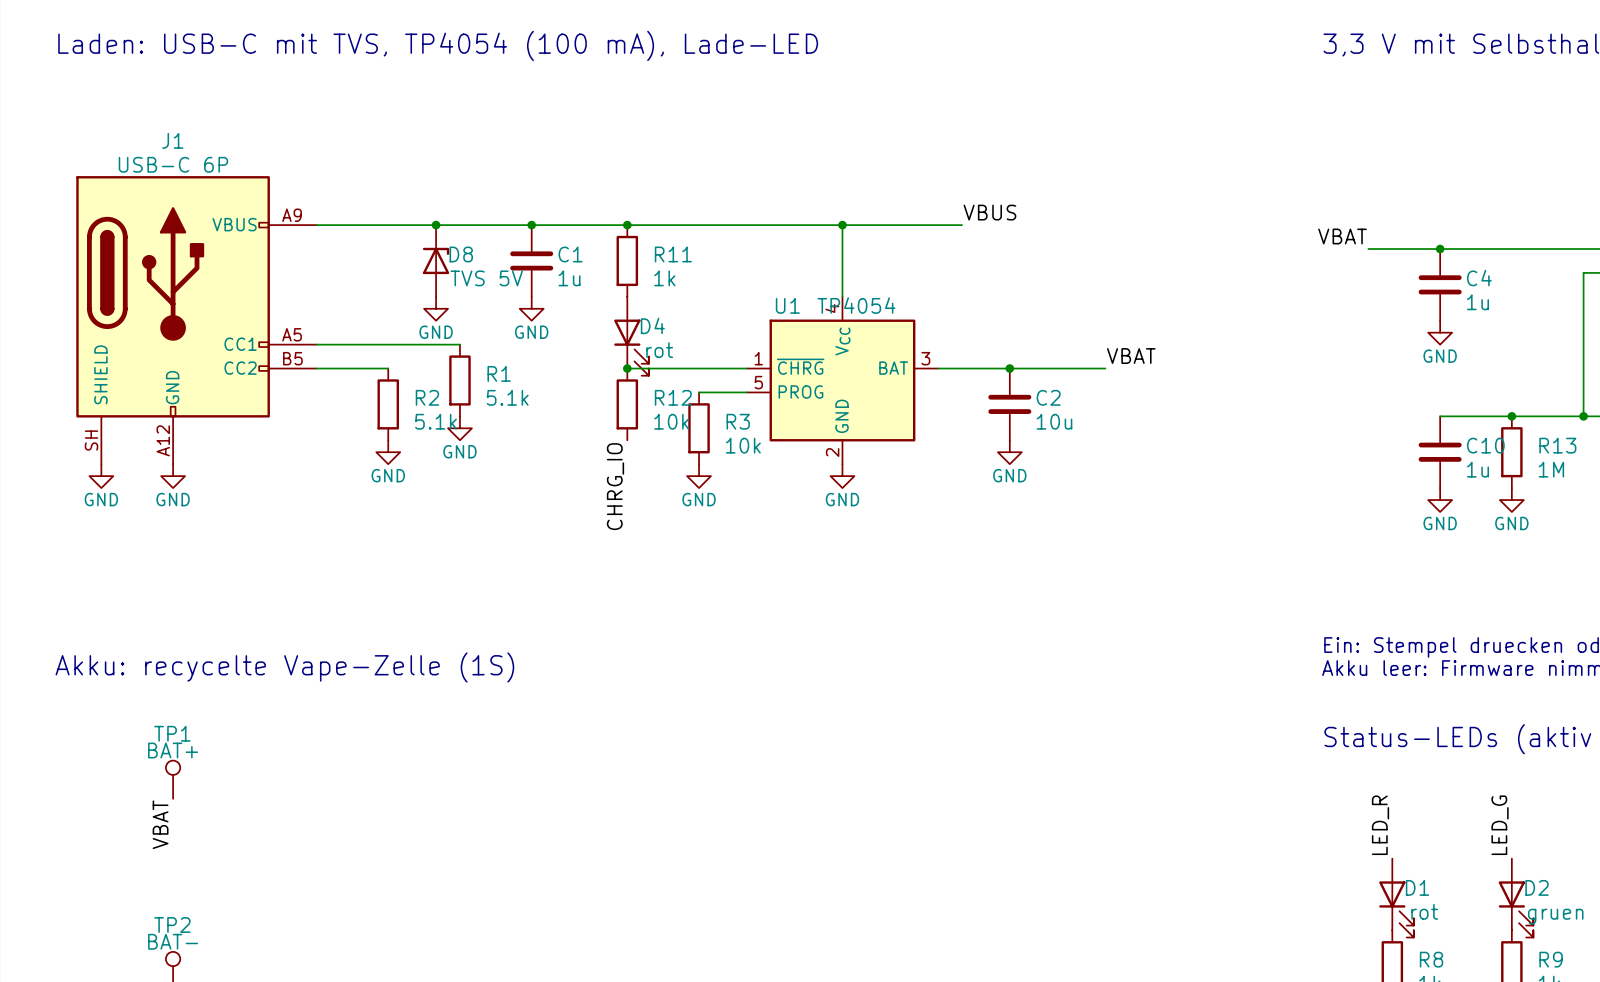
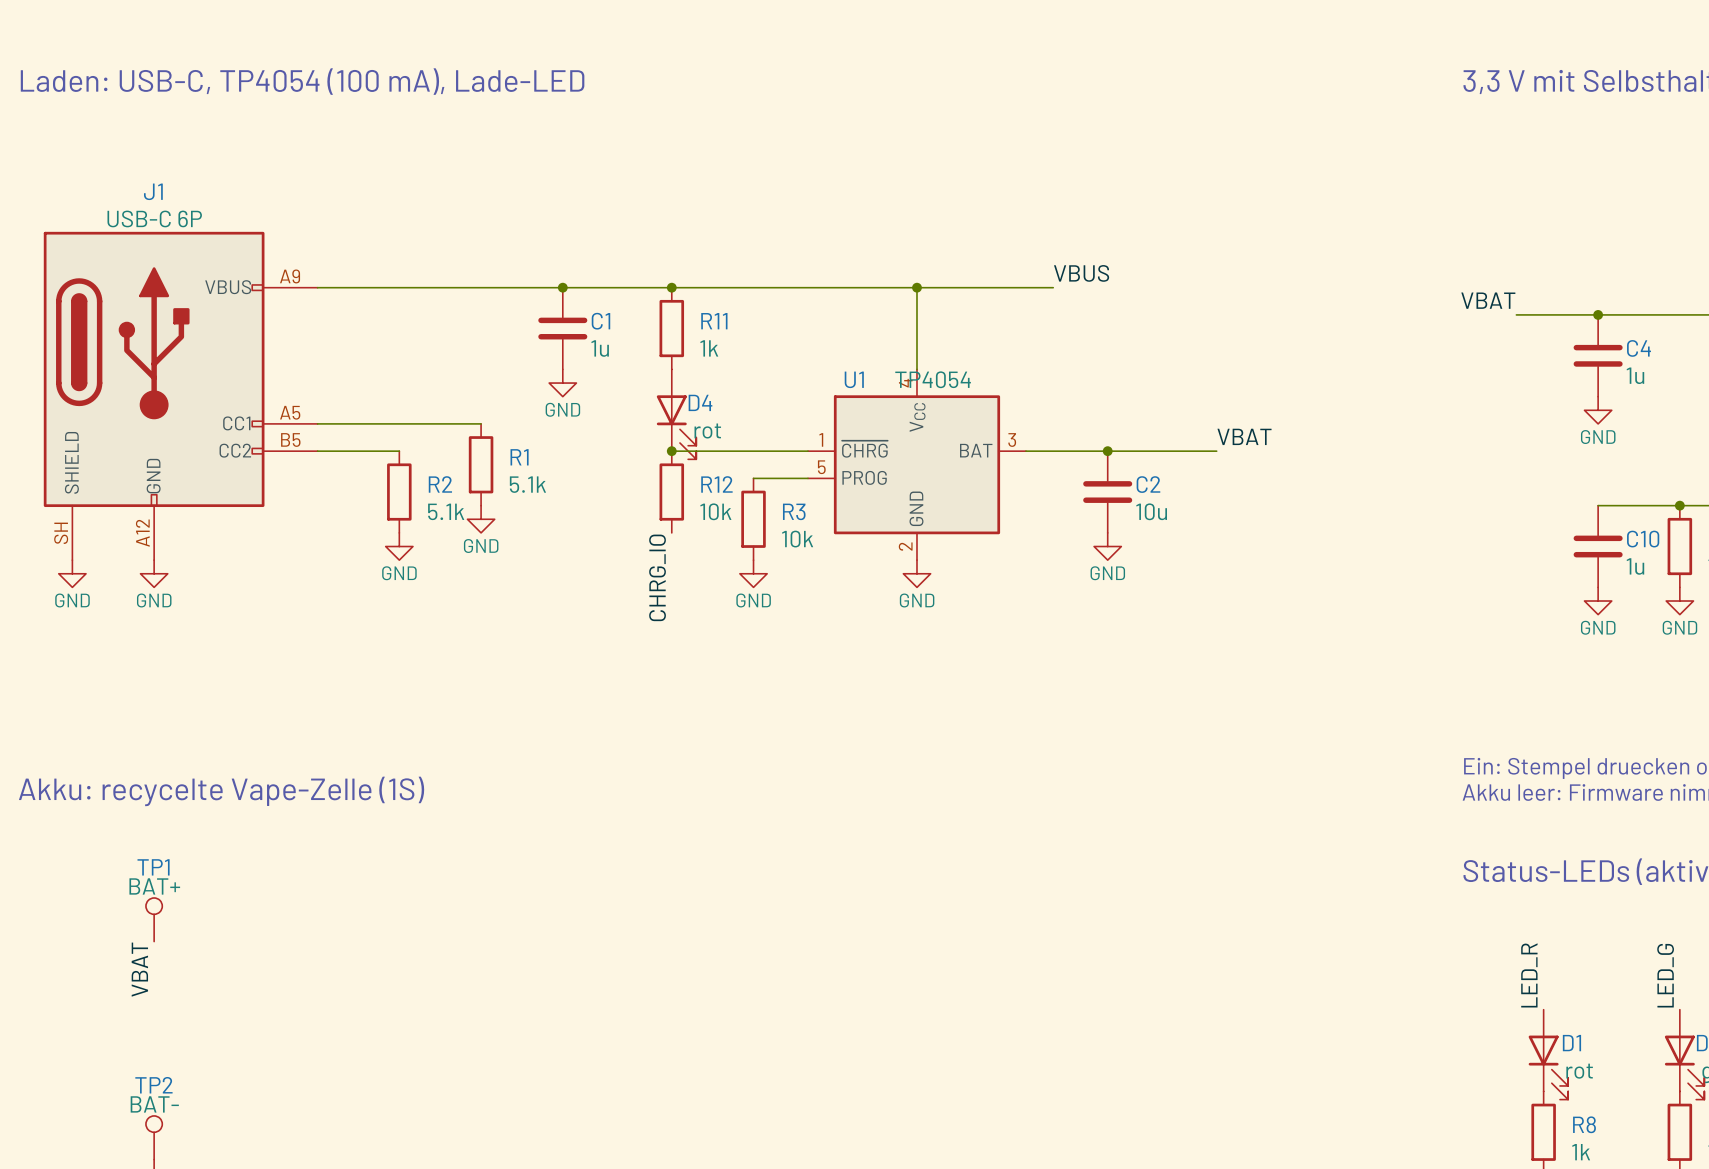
text: Laden: USB-C mit TVS, TP4054 (100 mA), Lade-LED (438, 45) -> Laden: USB-C, TP4054 (100 mA), Lade-LED (302, 81)
junction: (436, 225) -> none
D8: TVS 5V (436, 260) -> none
power symbol: GND (436, 308) -> none

